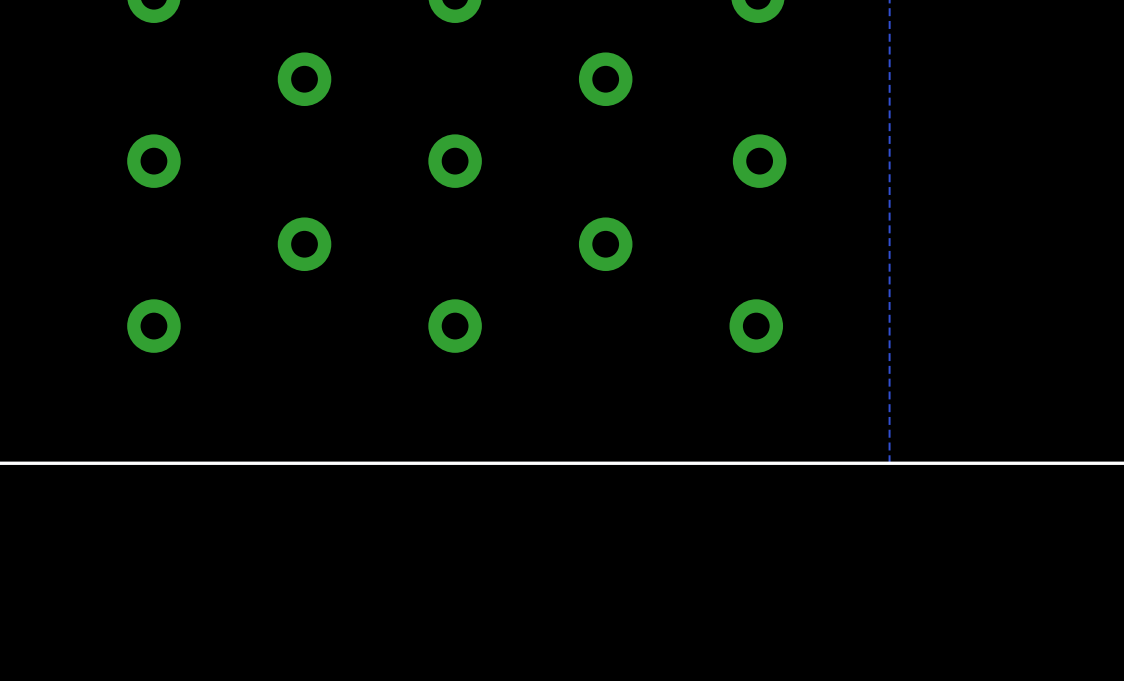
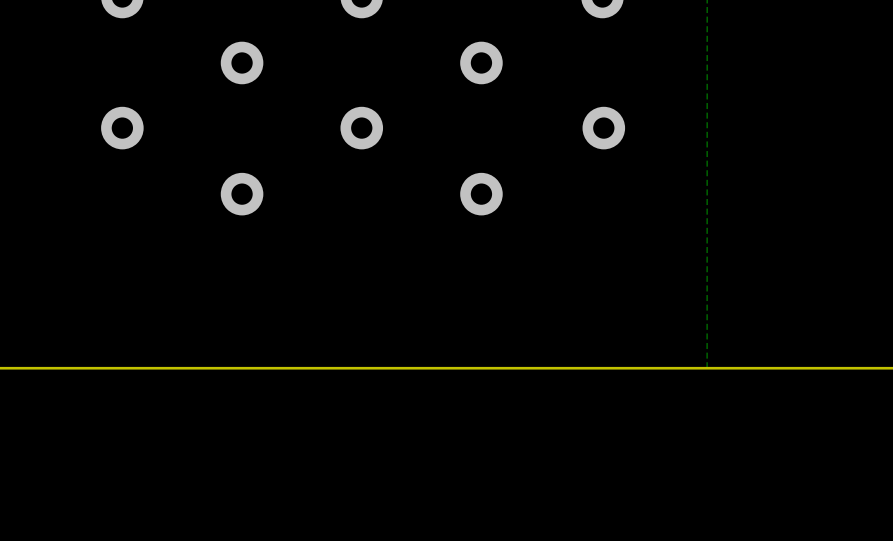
via: (153, 326) -> none
via: (455, 326) -> none
via: (756, 326) -> none

